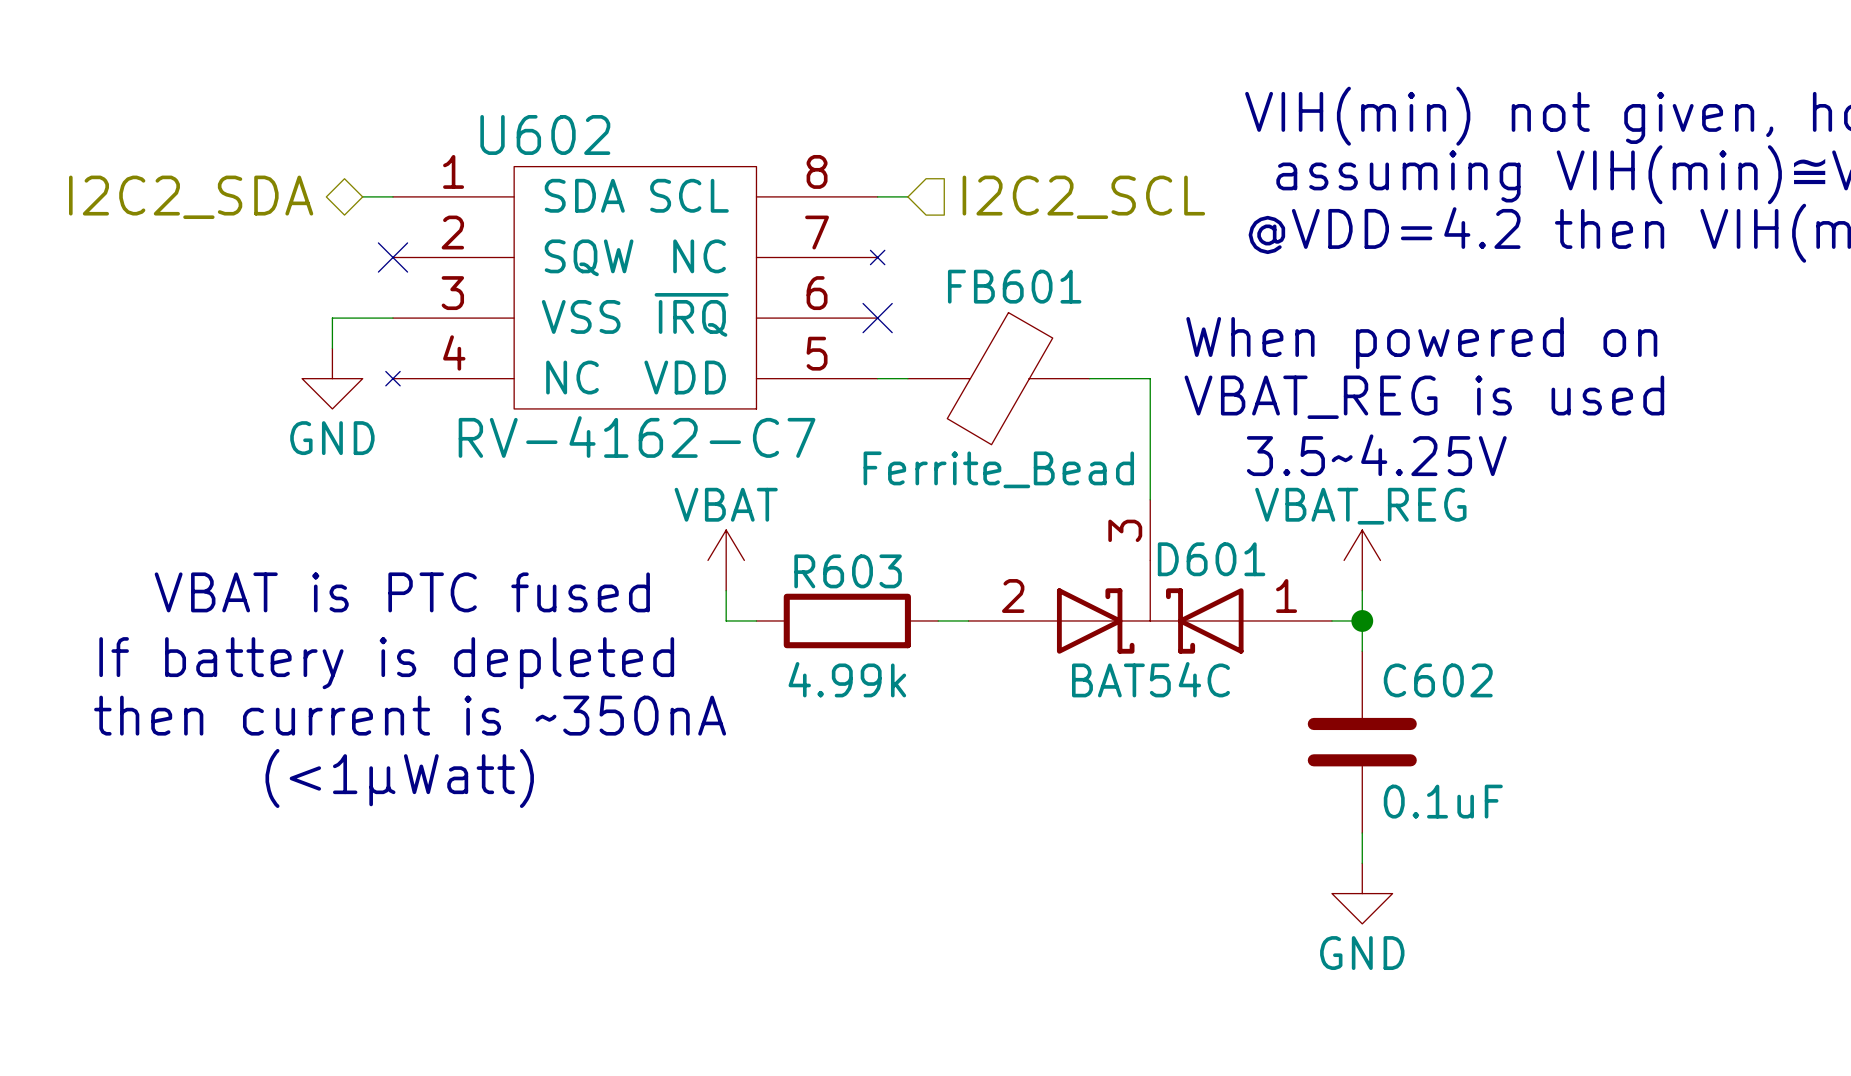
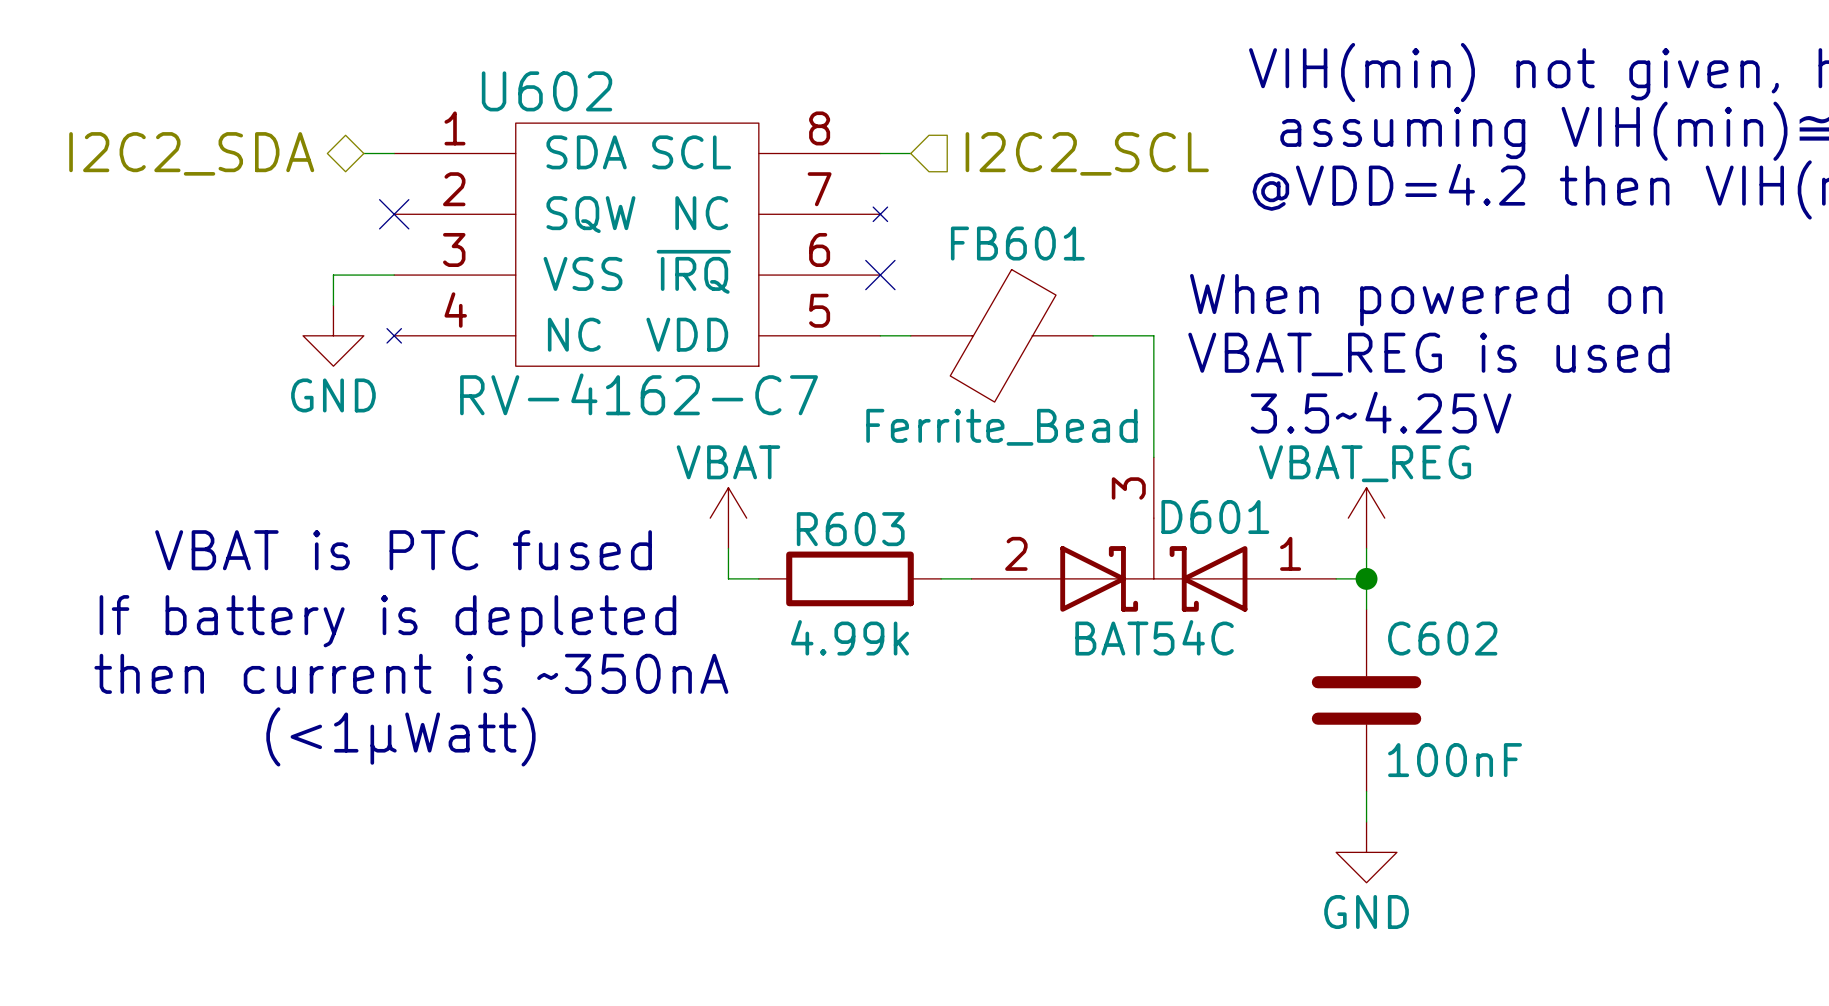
C602 value: 0.1uF (1443, 801) -> 100nF (1455, 760)

